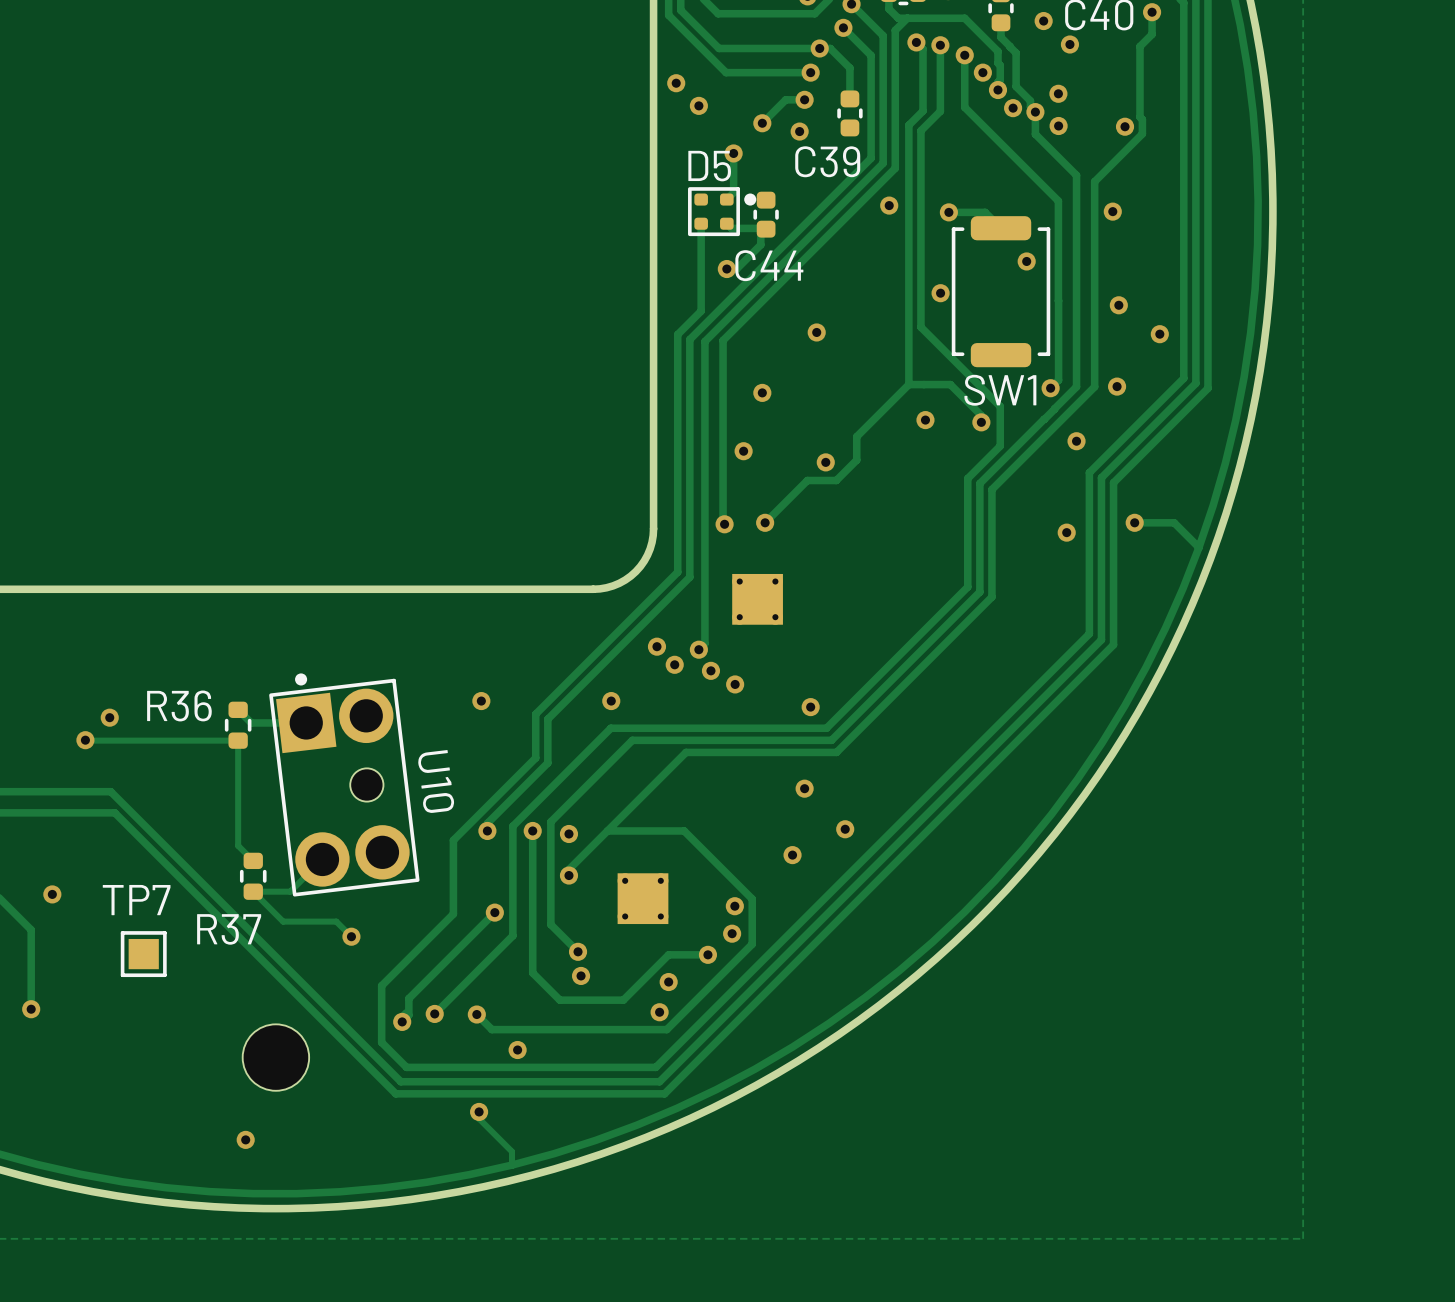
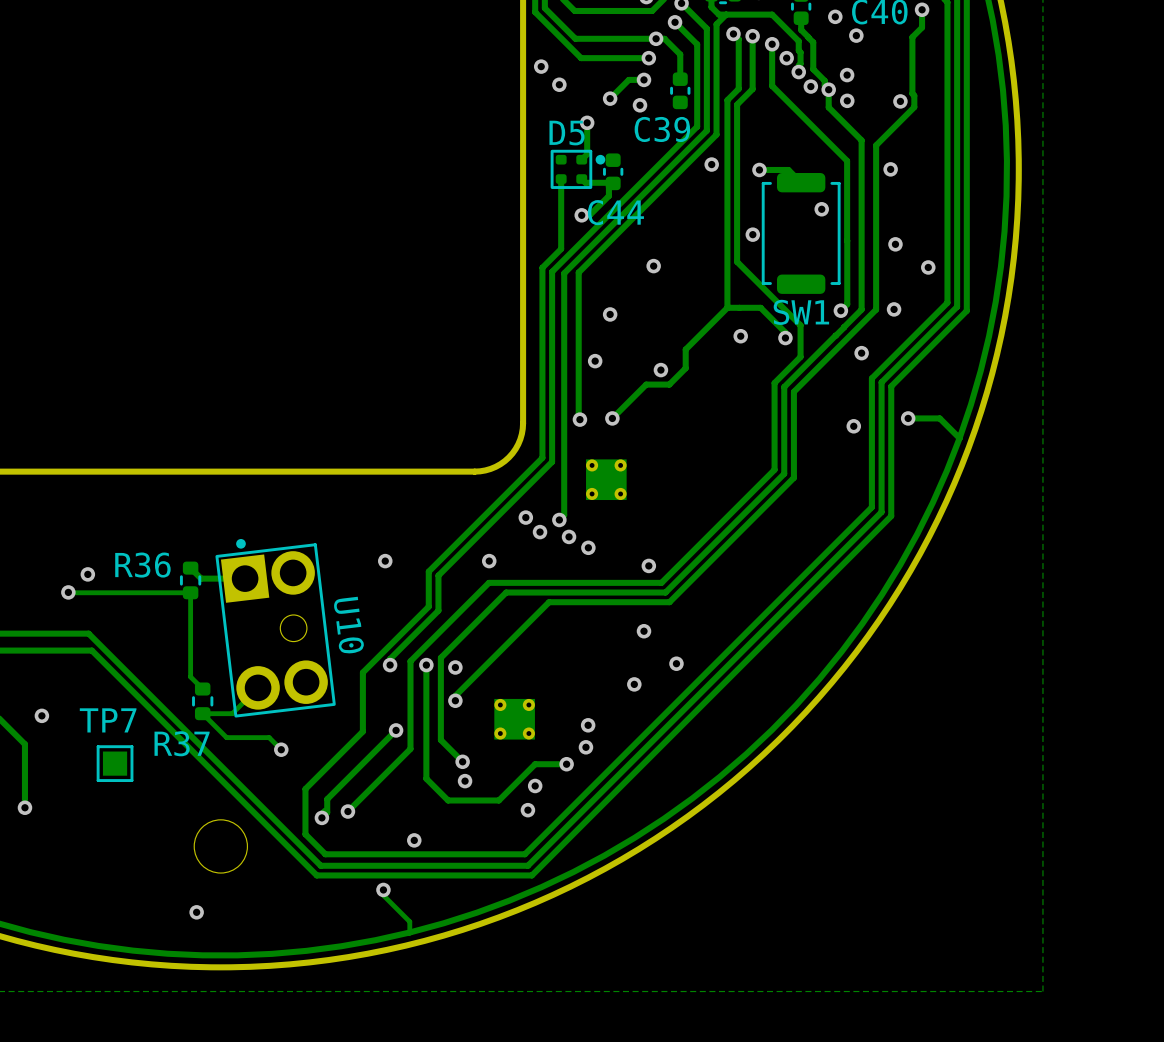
track: (607, 830) (684, 830) (752, 899) (752, 944) (666, 1029) (491, 1029) (476, 1014) -> none
via: (476, 1014) -> none

